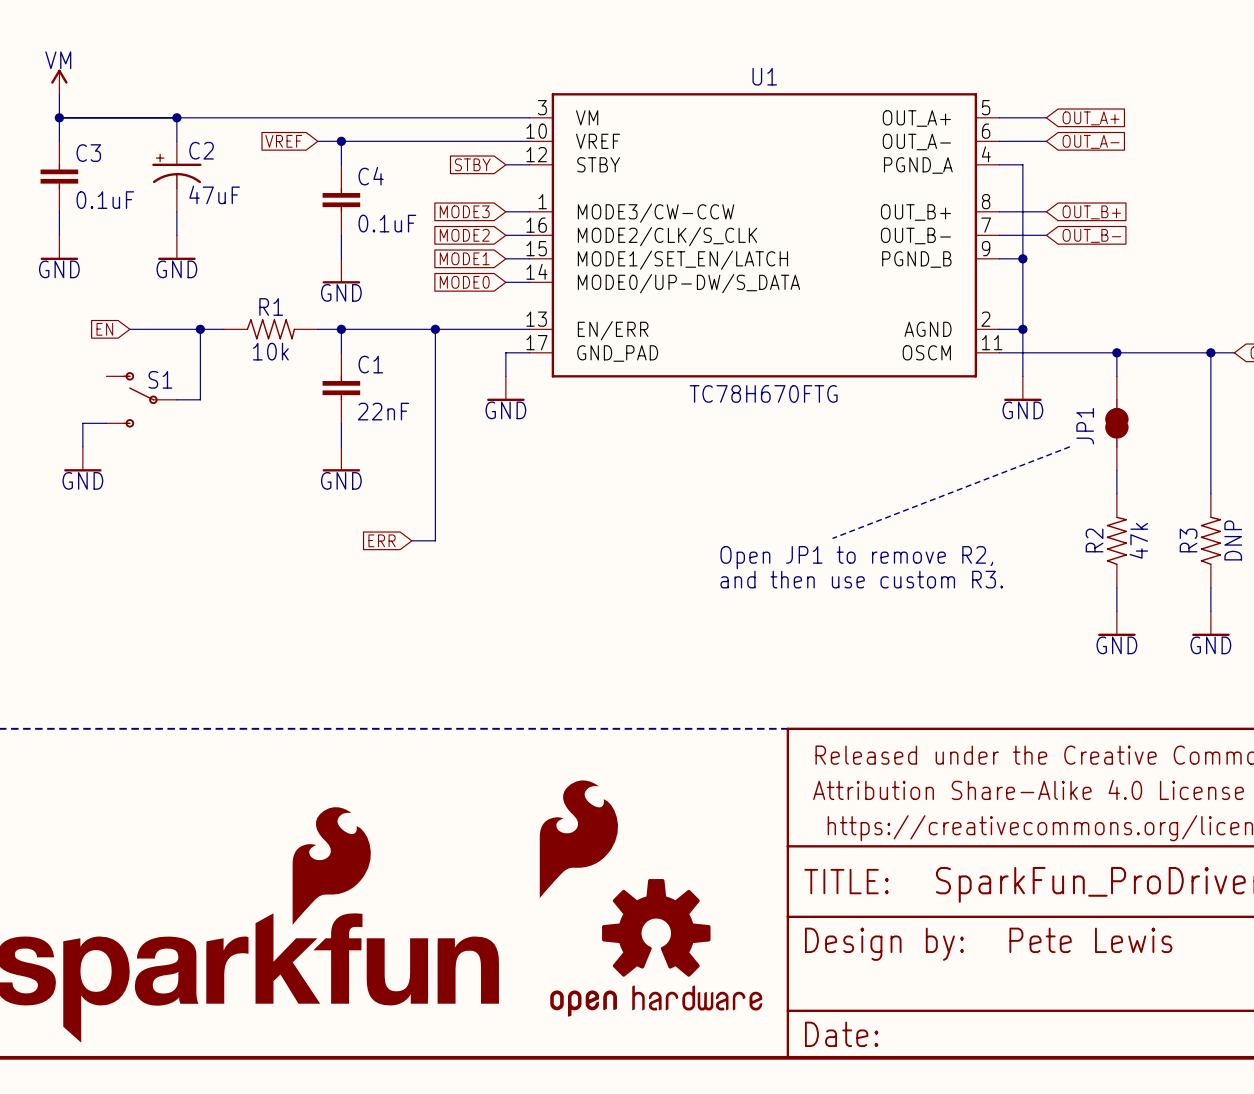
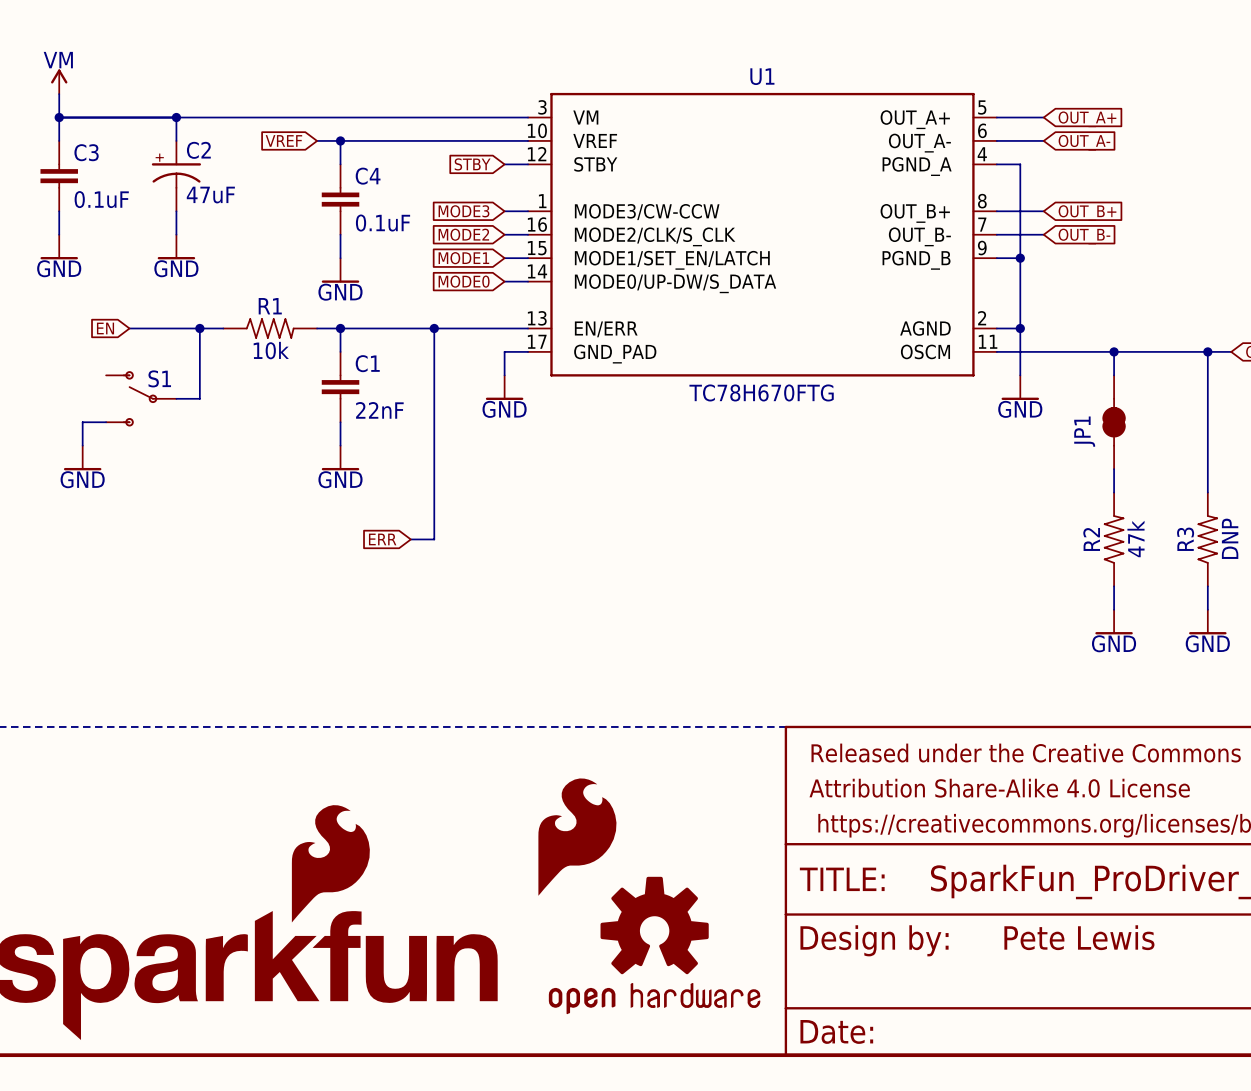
line: (1069, 446) (832, 538) -> none
text: Open JP1 to remove R2, (856, 557) -> none
text: and then use custom R3. (861, 579) -> none

